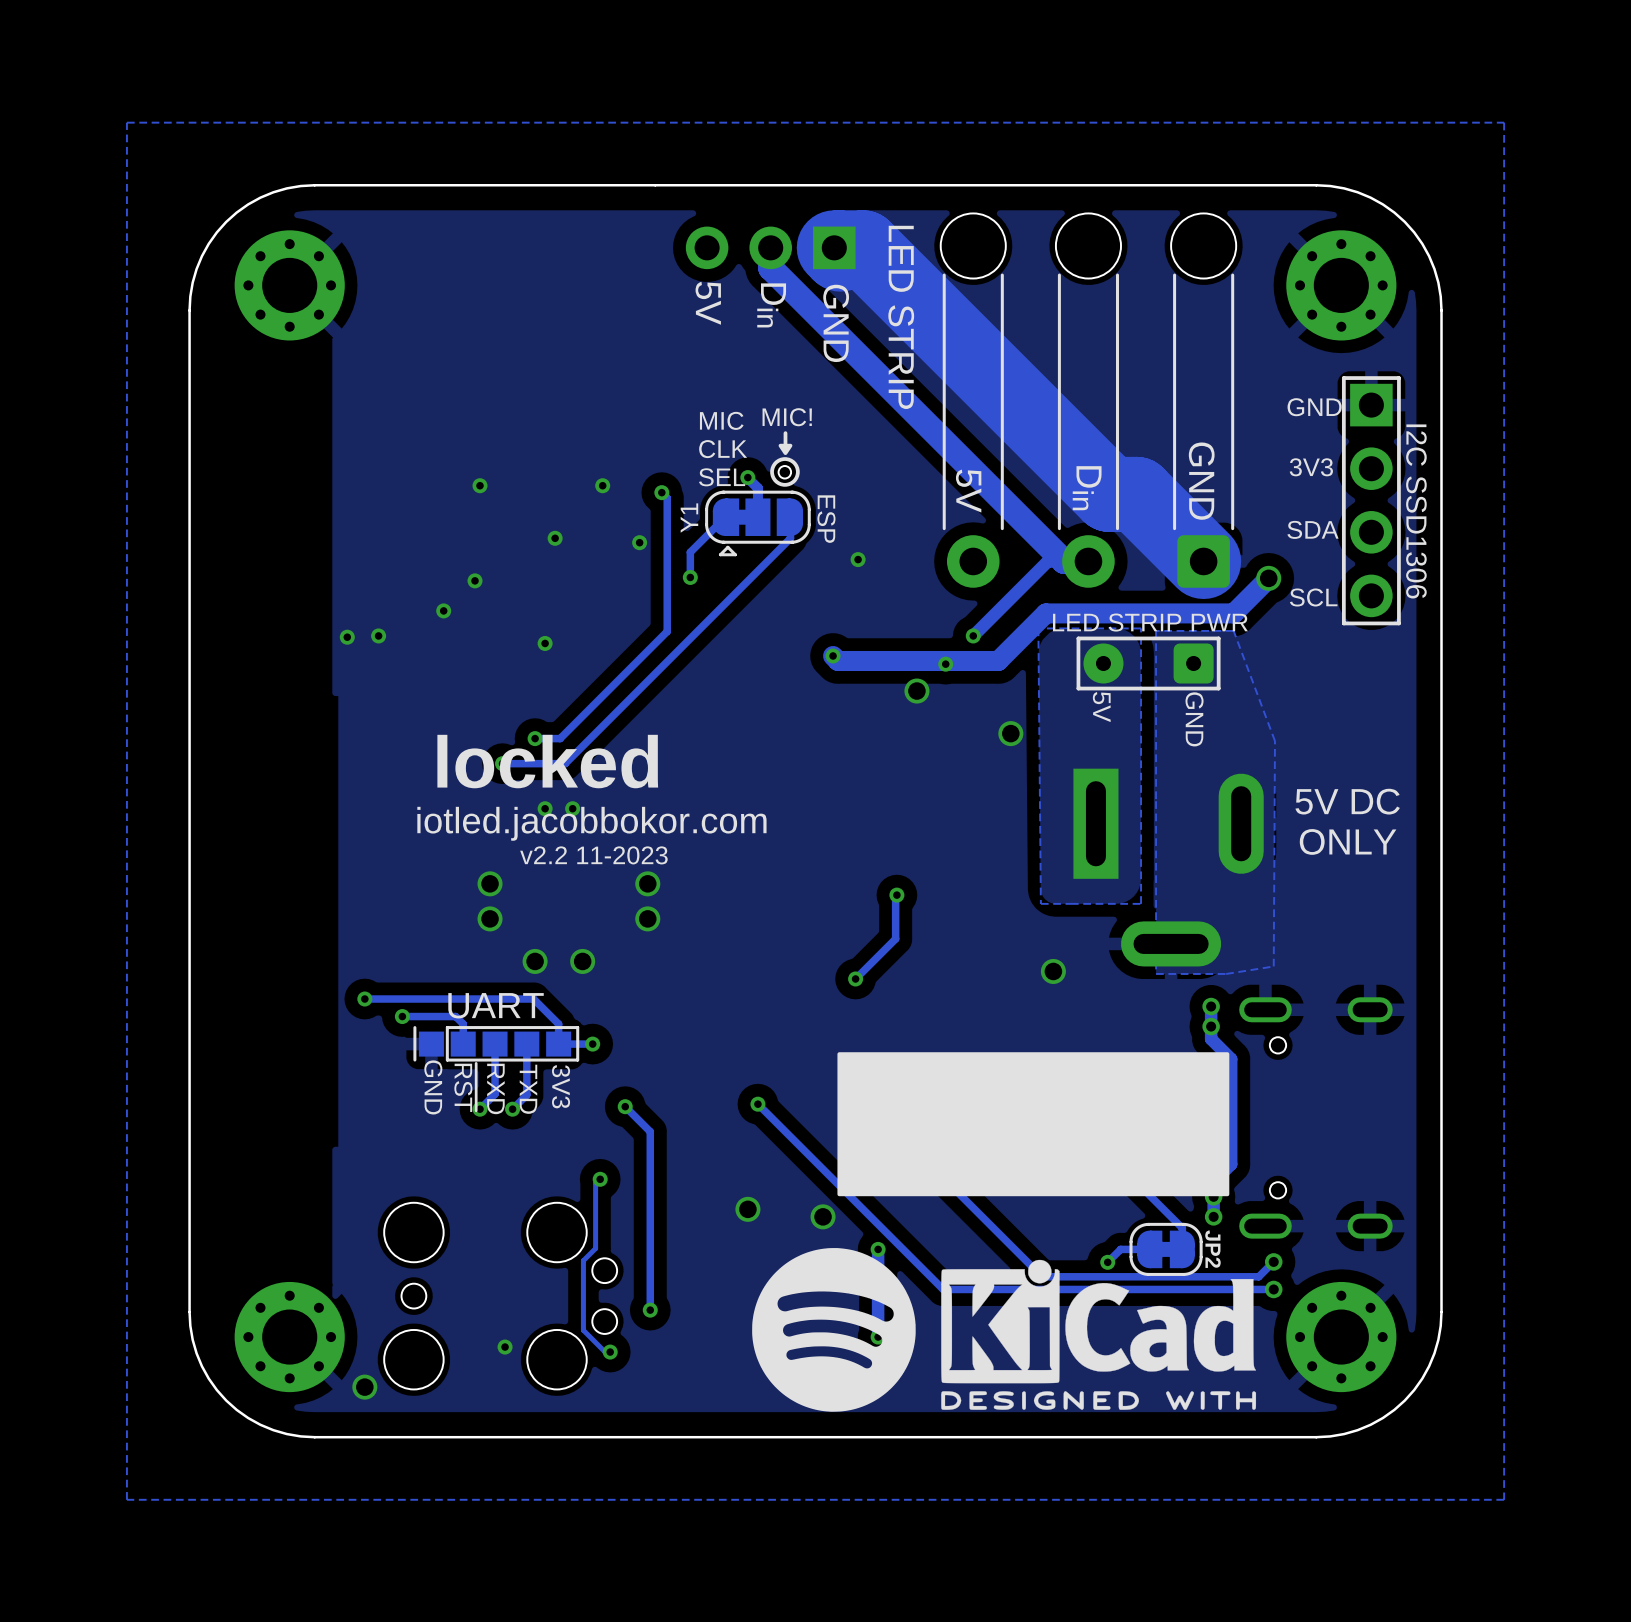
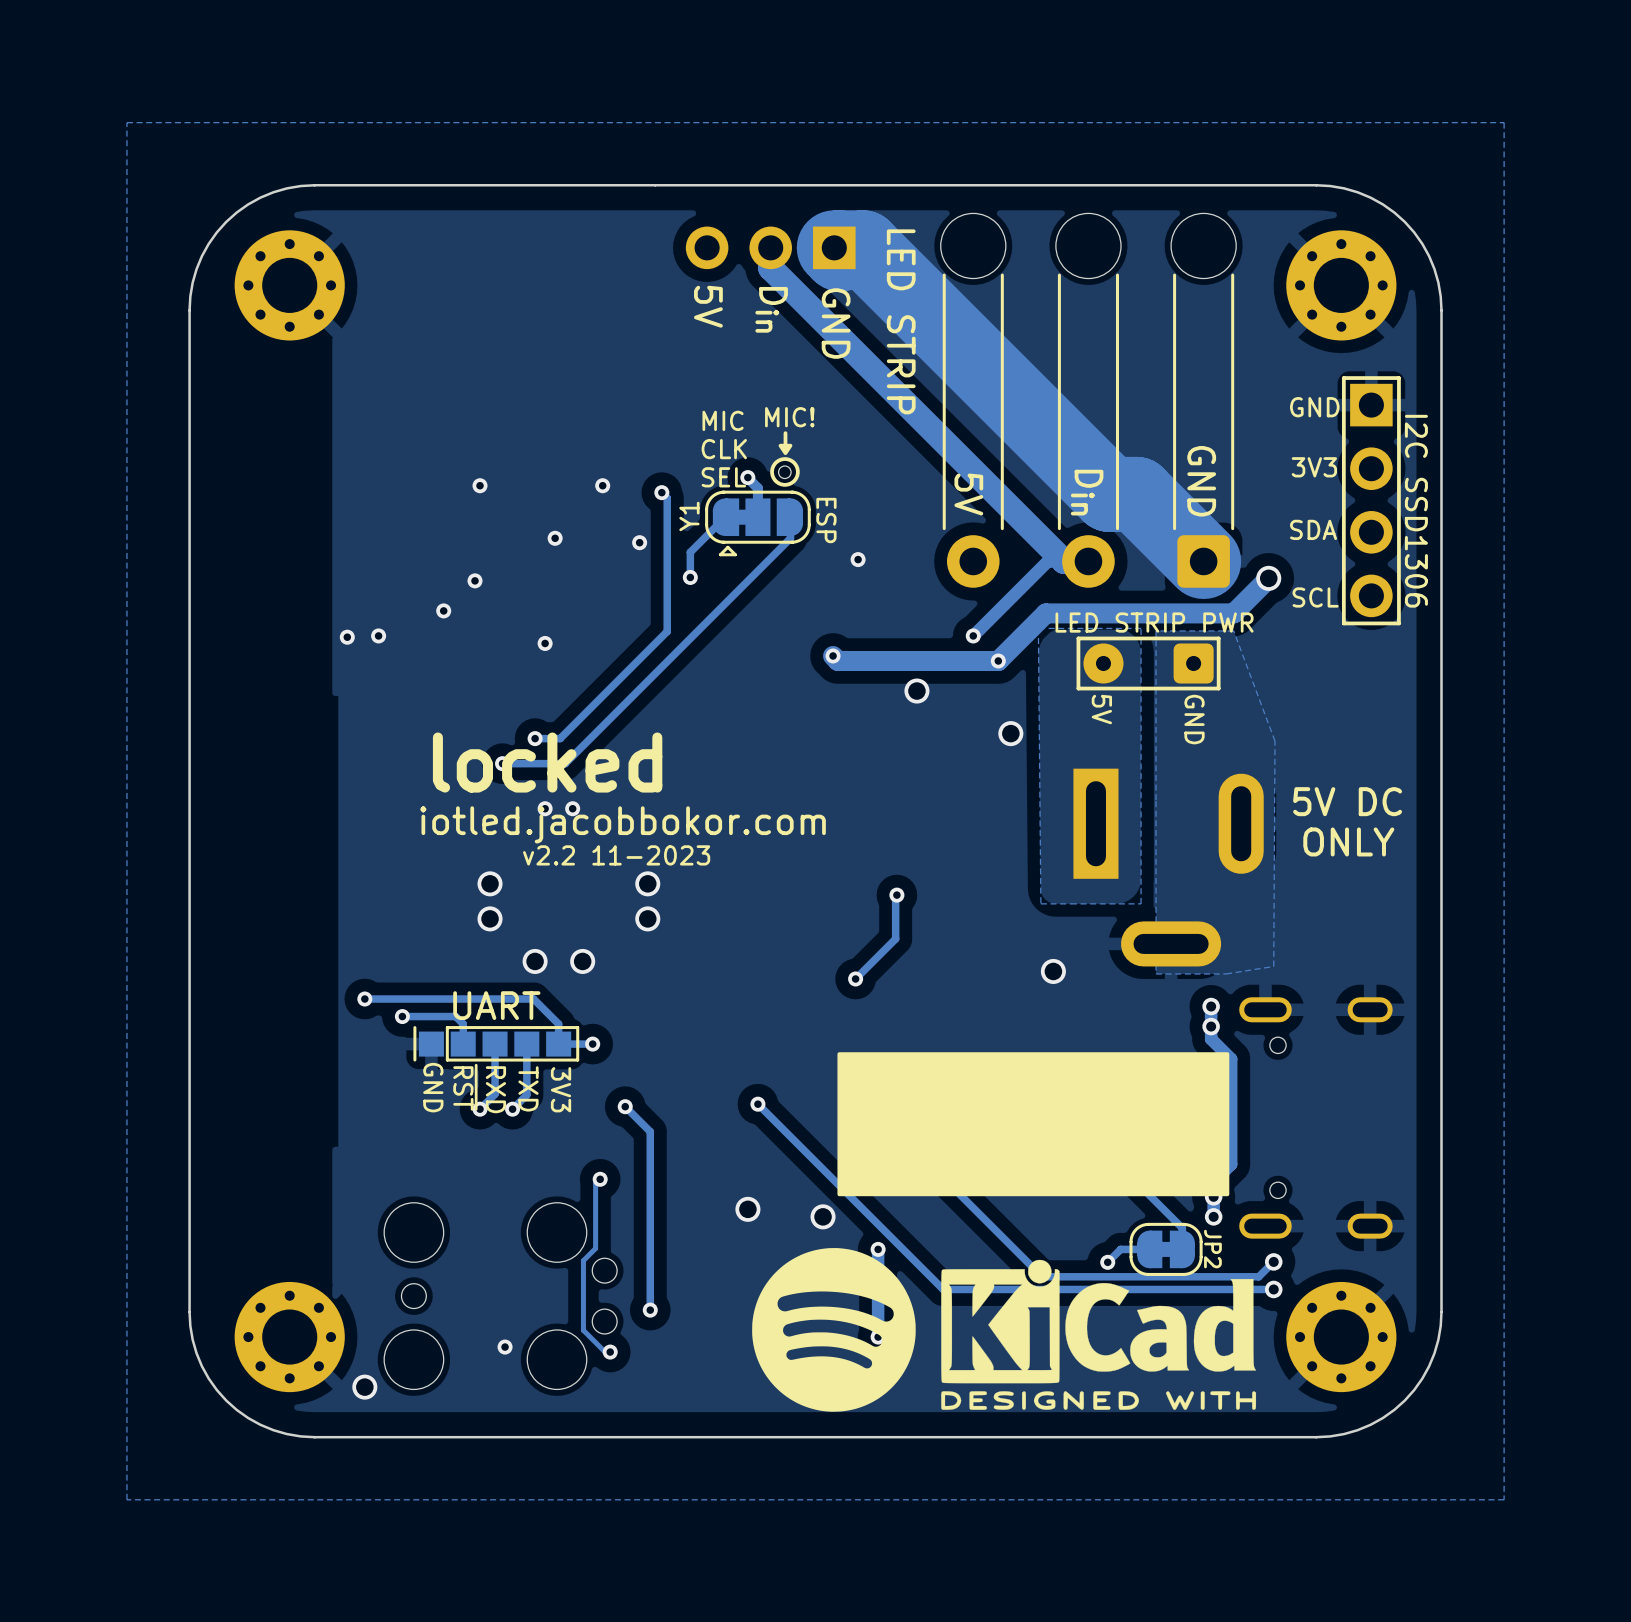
via position: (945, 664) -> (998, 660)

